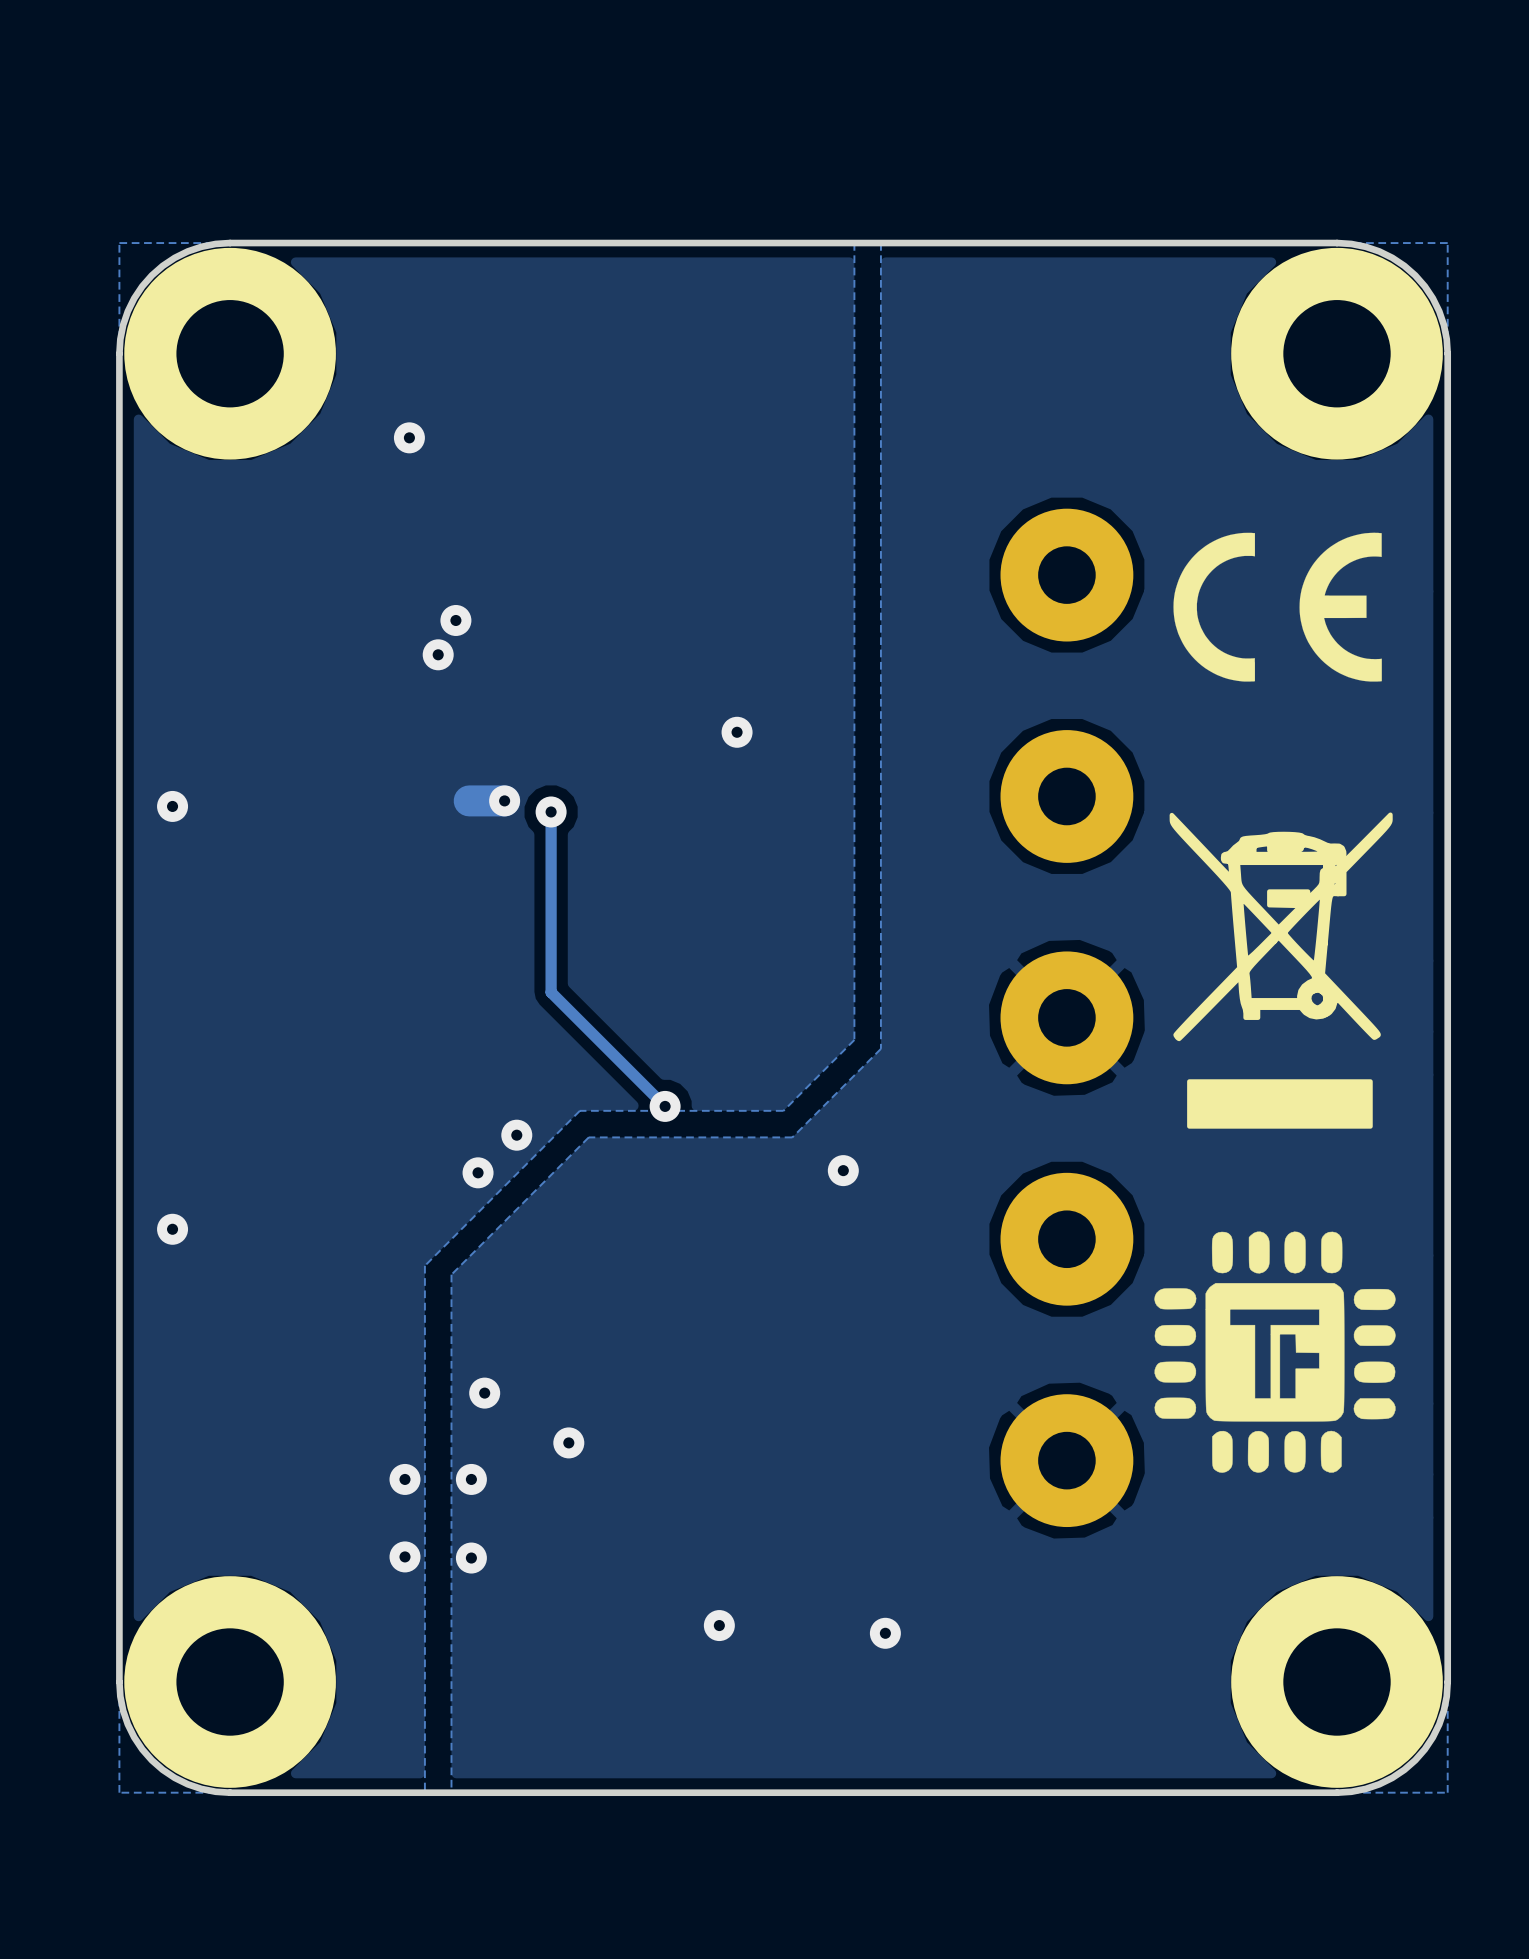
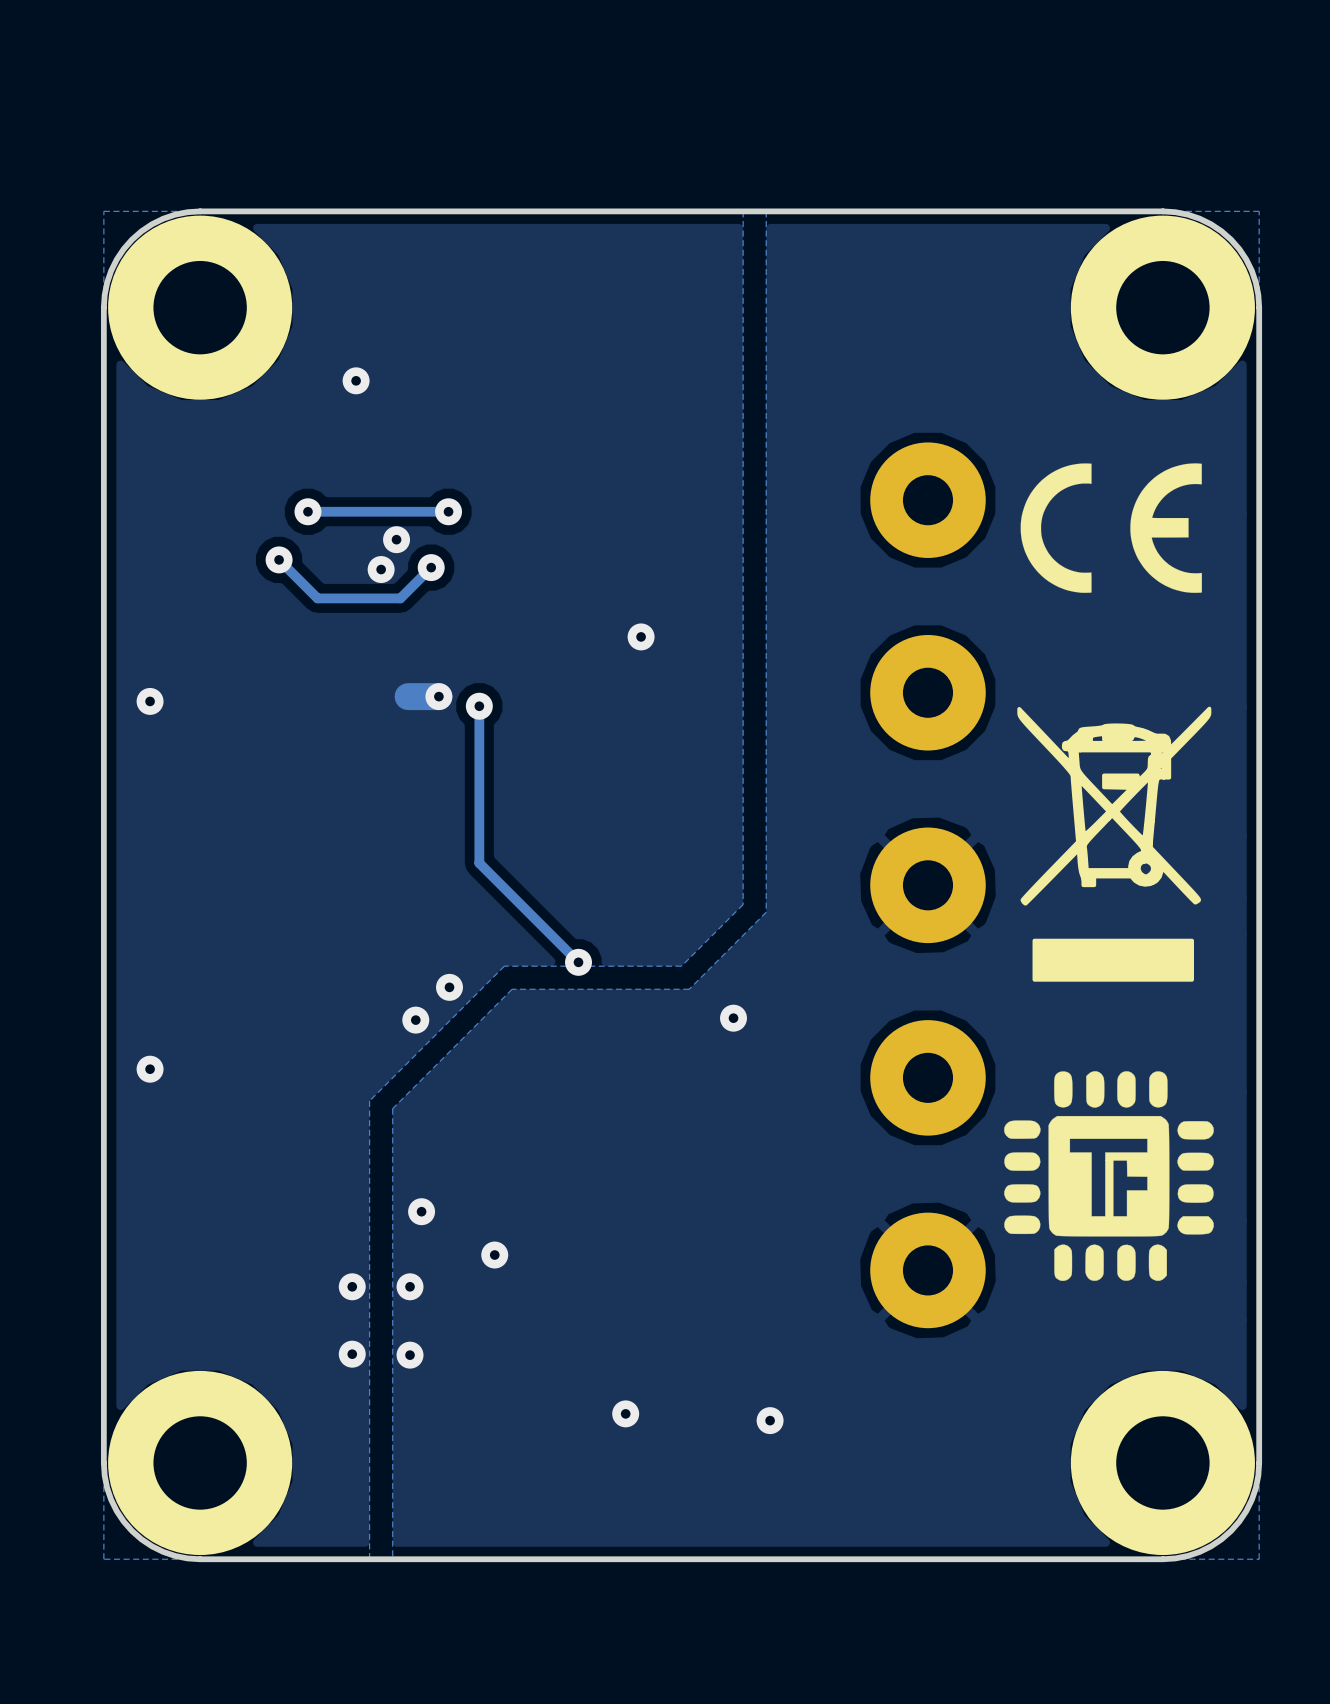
via: none -> (307, 511)
track: none -> (448, 511) (307, 511)
via: none -> (448, 511)
track: none -> (279, 559) (317, 598) (400, 598) (431, 567)
via: none -> (279, 559)
via: none -> (431, 567)

